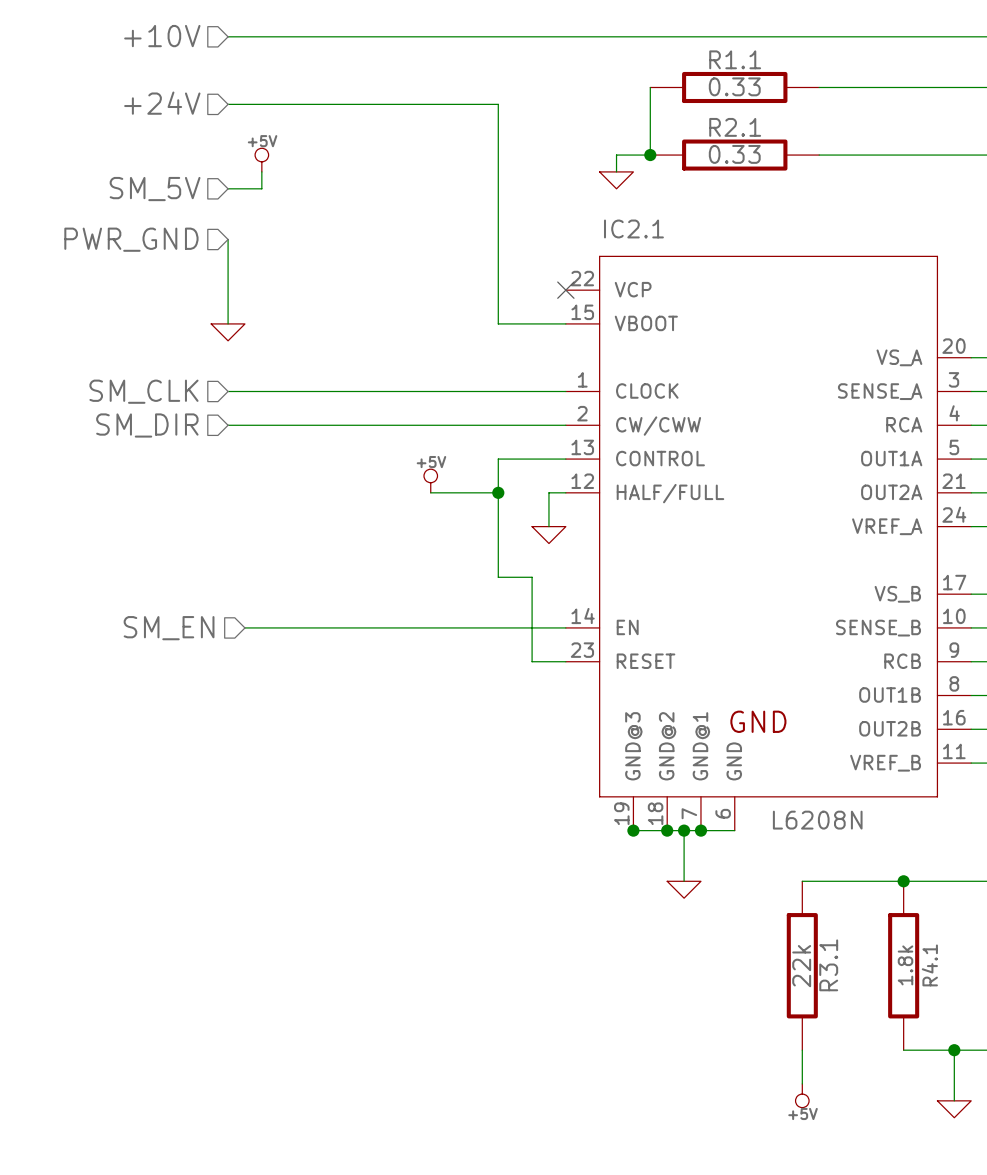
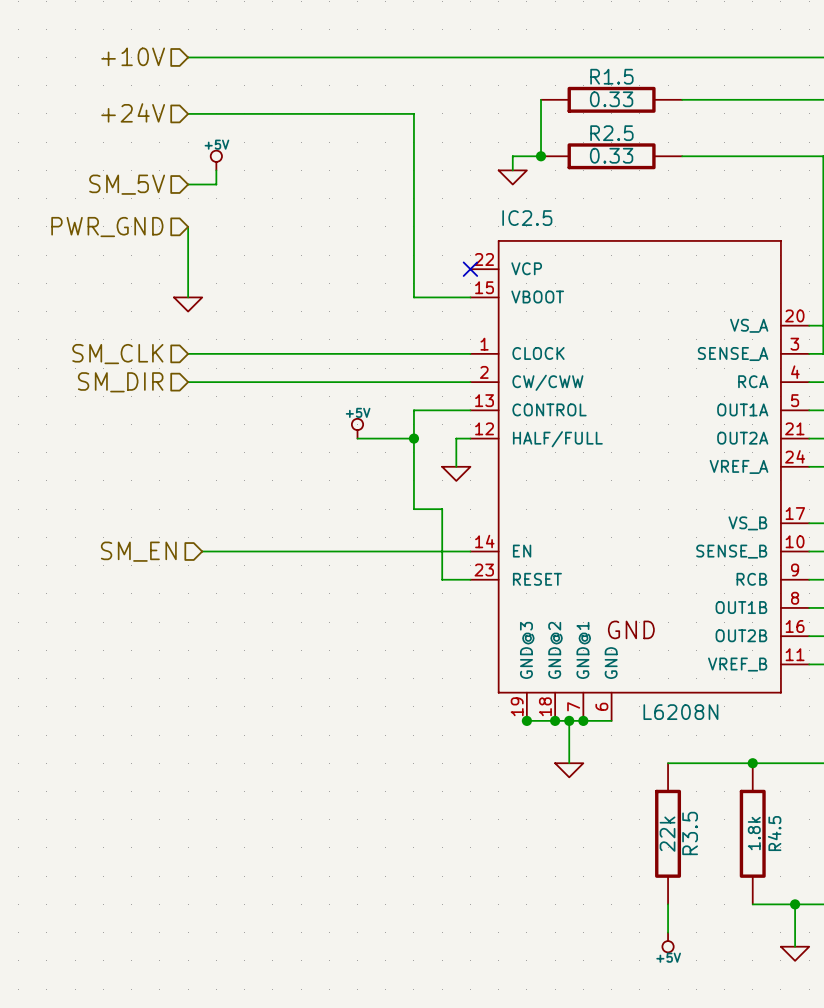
R1.1 name: R1.1 (735, 59) -> R1.5 (611, 76)
R2.1 name: R2.1 (735, 127) -> R2.5 (611, 133)
IC2.1 name: IC2.1 (633, 228) -> IC2.5 (527, 218)
R3.1 name: R3.1 (828, 965) -> R3.5 (690, 833)
R4.1 name: R4.1 (929, 965) -> R4.5 (774, 833)

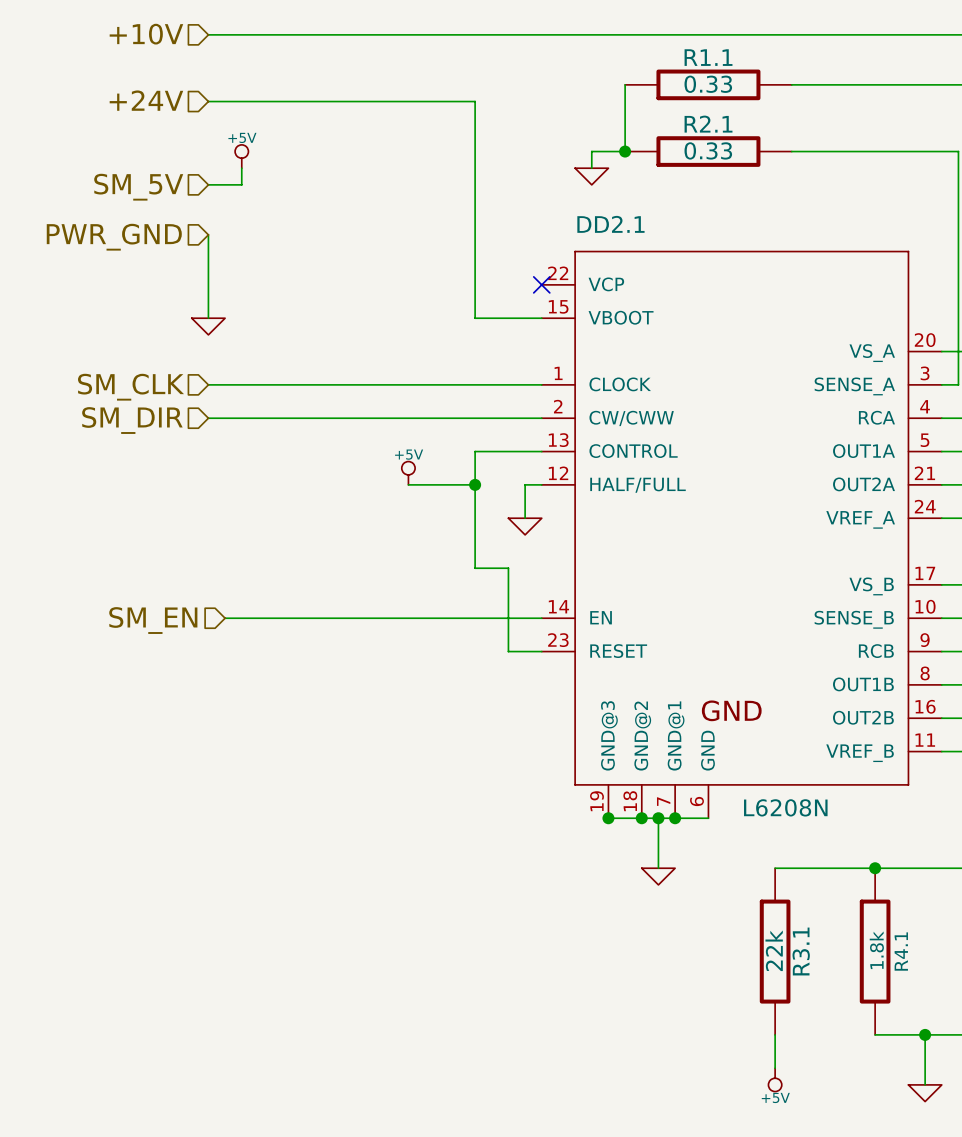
R1.5 name: R1.5 (611, 76) -> R1.1 (708, 57)
R2.5 name: R2.5 (611, 133) -> R2.1 (708, 124)
IC2.5 name: IC2.5 (527, 218) -> DD2.1 (610, 224)
R3.5 name: R3.5 (690, 833) -> R3.1 (801, 951)
R4.5 name: R4.5 (774, 833) -> R4.1 (901, 951)

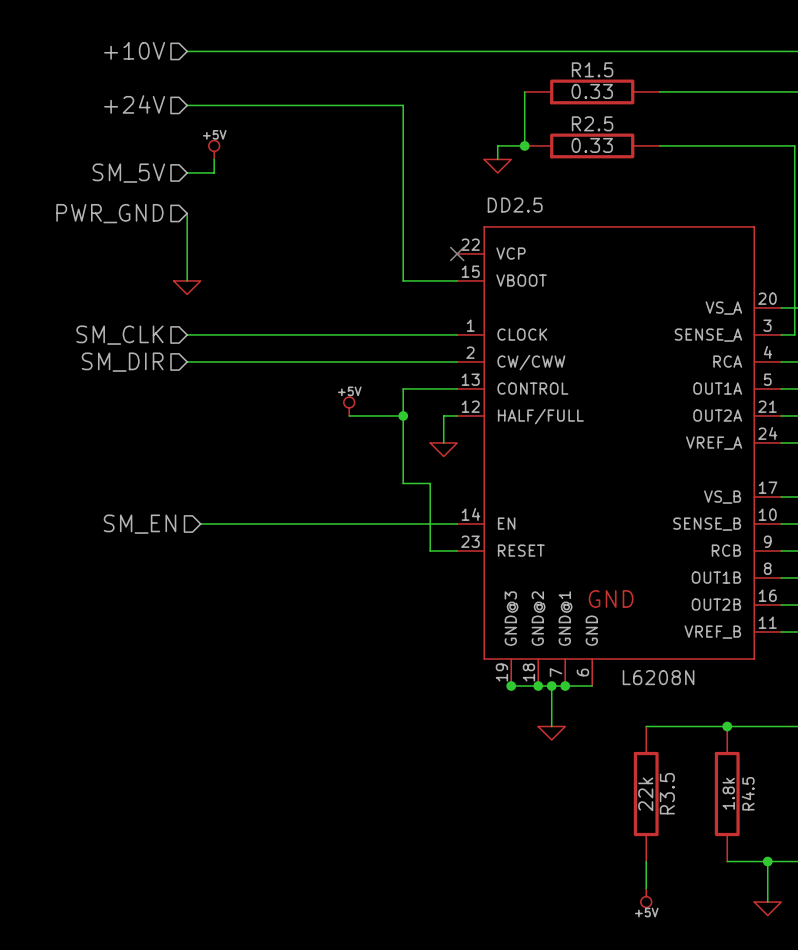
R1.1 name: R1.1 (708, 57) -> R1.5 (592, 69)
R2.1 name: R2.1 (708, 124) -> R2.5 (592, 123)
DD2.1 name: DD2.1 (610, 224) -> DD2.5 (515, 205)
R3.1 name: R3.1 (801, 951) -> R3.5 (667, 793)
R4.1 name: R4.1 (901, 951) -> R4.5 (748, 793)

